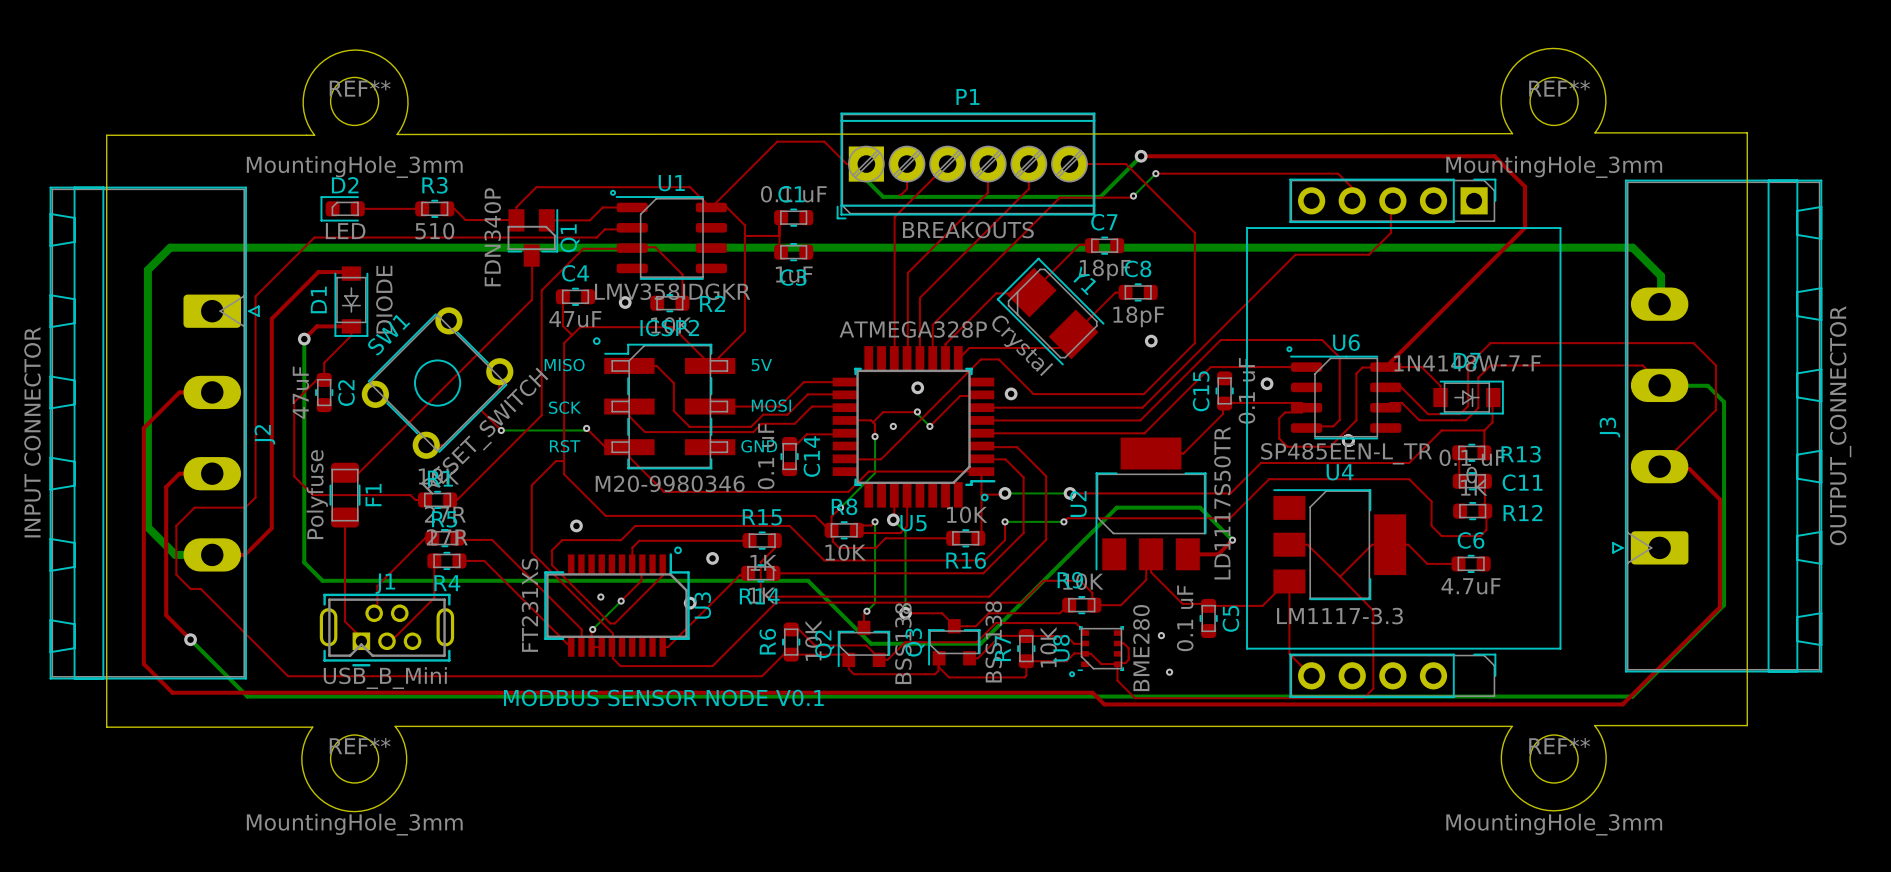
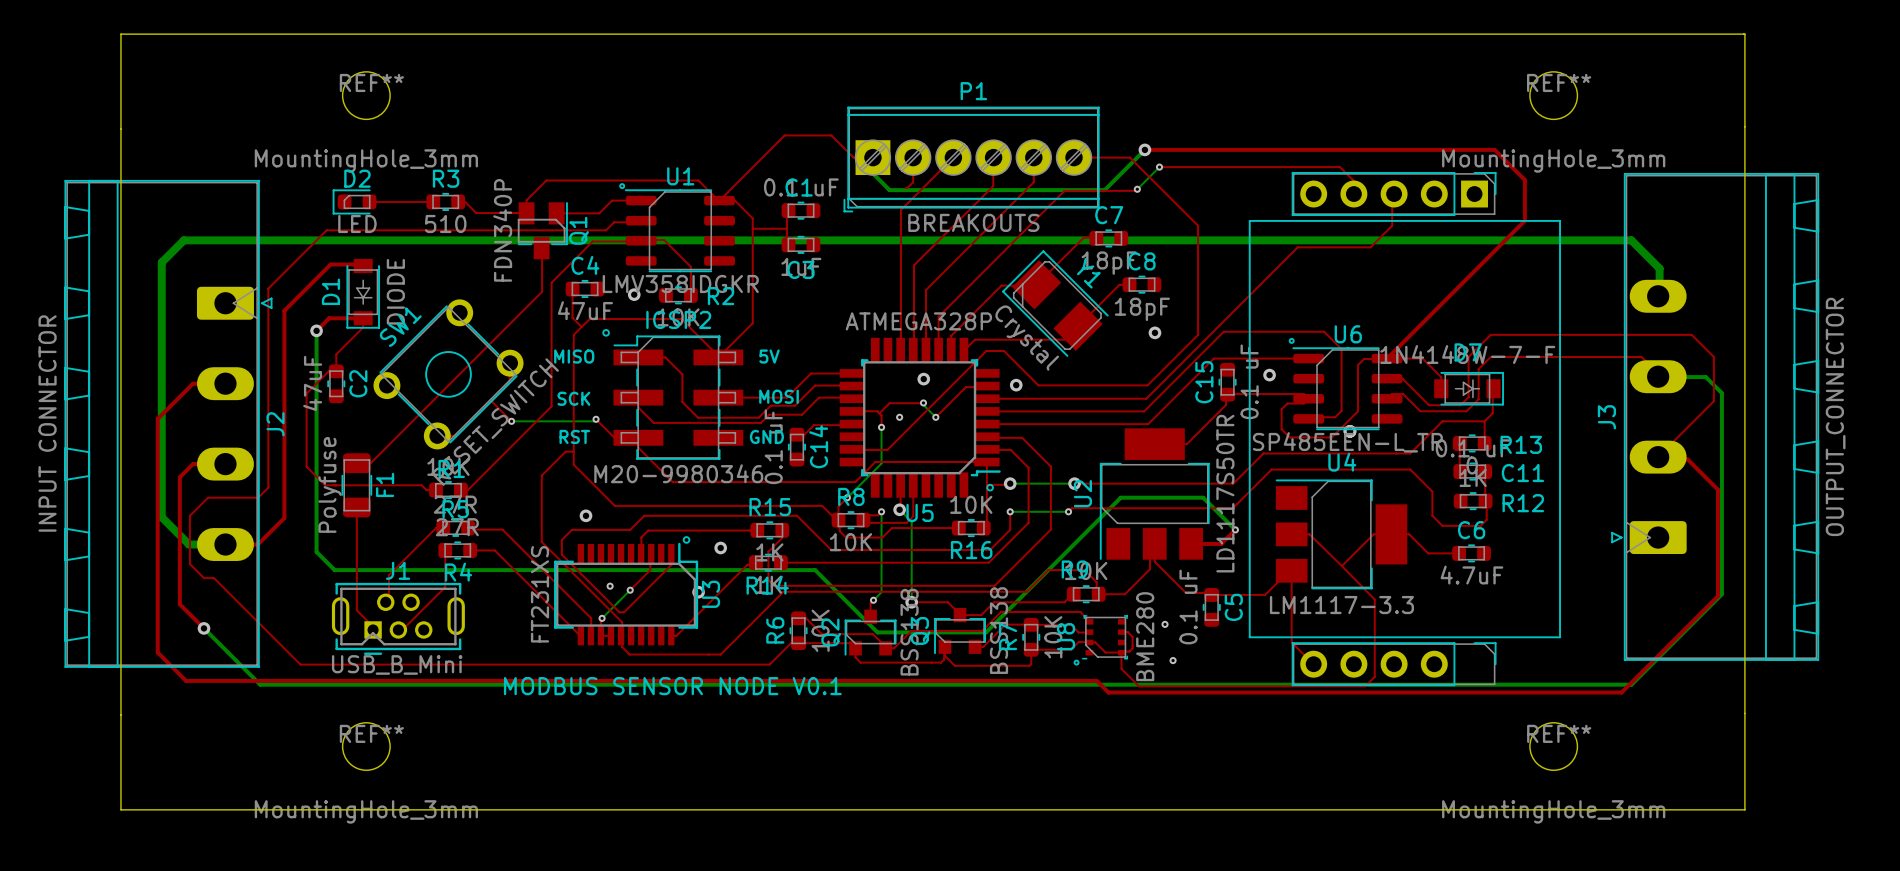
board edge: (1747, 132) (1595, 132) (1601, 121) (1605, 102) (1604, 89) (1600, 77) (1593, 66) (1583, 57) (1572, 51) (1552, 48) (1540, 50) (1522, 58) (1513, 67) (1506, 78) (1502, 90) (1501, 103) (1505, 122) (1512, 133) (397, 134) (403, 123) (407, 110) (406, 91) (402, 79) (390, 63) (380, 56) (367, 51) (355, 50) (342, 51) (330, 56) (319, 64) (308, 80) (304, 92) (303, 105) (305, 118) (314, 135) (106, 135) -> (1744, 126) (1744, 34) (120, 34) (120, 129)
board edge: (1747, 725) (1594, 725) (1601, 736) (1606, 755) (1605, 768) (1601, 780) (1594, 791) (1579, 804) (1567, 809) (1554, 810) (1541, 809) (1529, 804) (1514, 792) (1506, 781) (1502, 769) (1501, 756) (1505, 737) (1512, 726) (395, 726) (402, 737) (406, 756) (405, 769) (401, 781) (390, 797) (379, 805) (367, 809) (354, 811) (341, 810) (329, 805) (314, 793) (307, 782) (303, 770) (302, 750) (306, 738) (312, 727) (106, 727) -> (1744, 713) (1744, 809) (120, 809) (120, 715)

